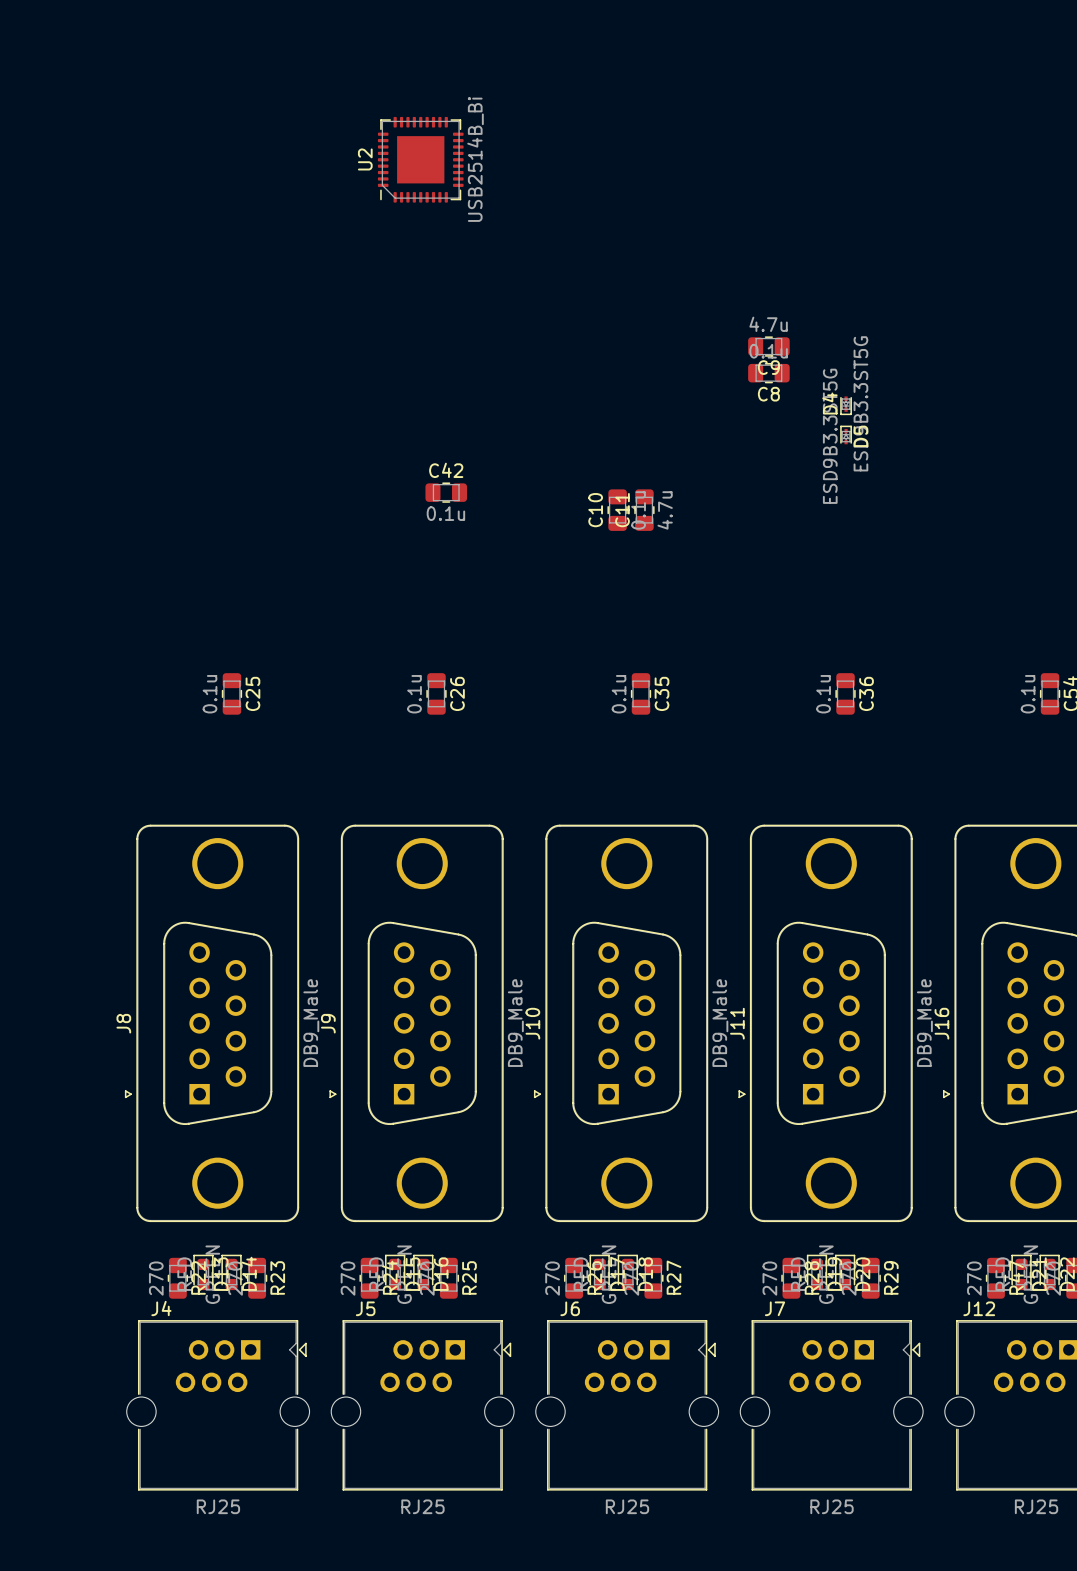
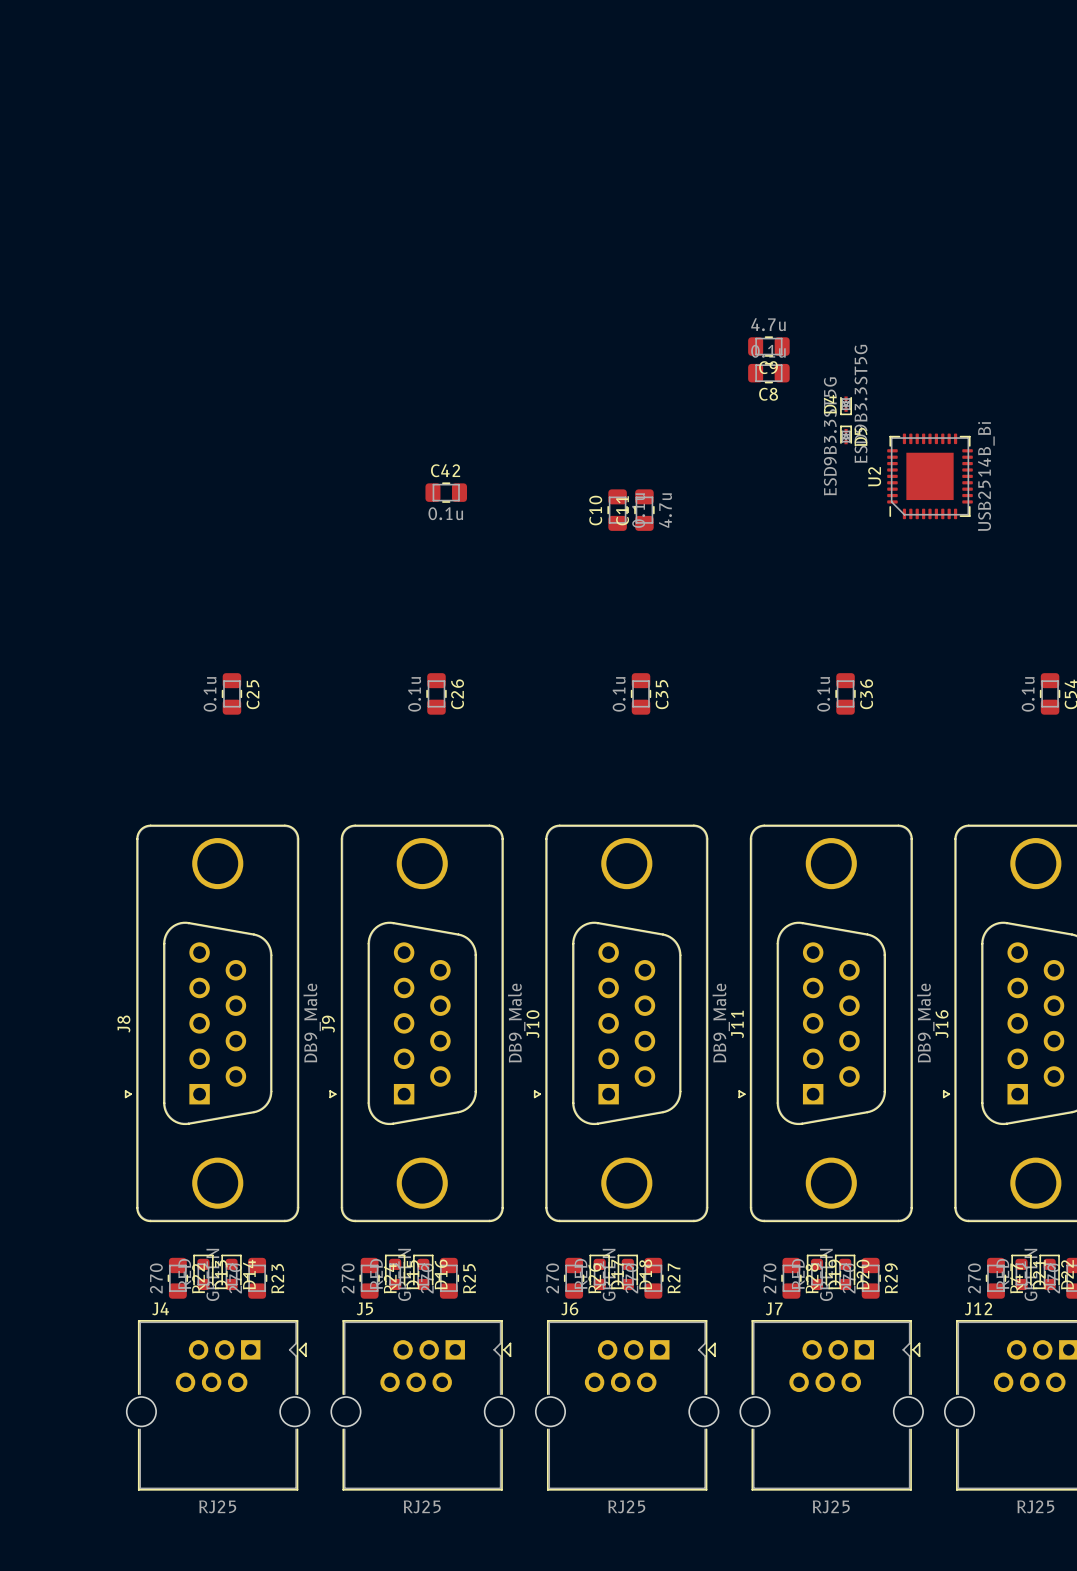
U2 position: (420, 159) -> (930, 476)

